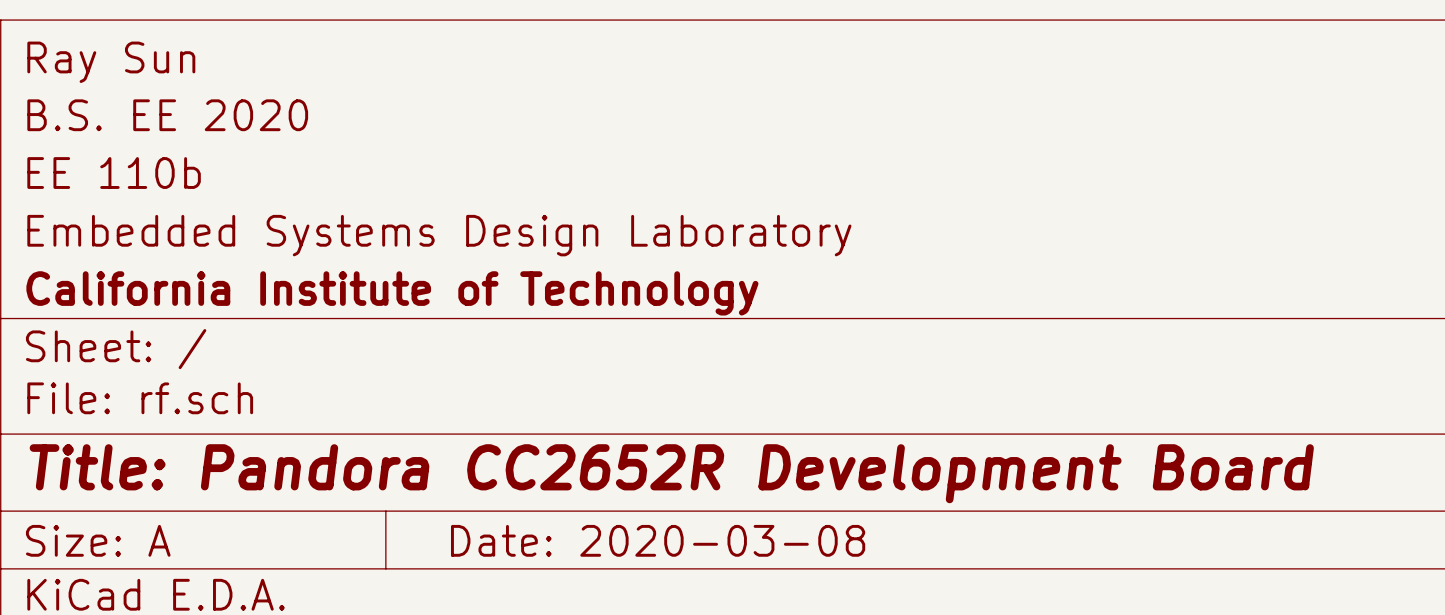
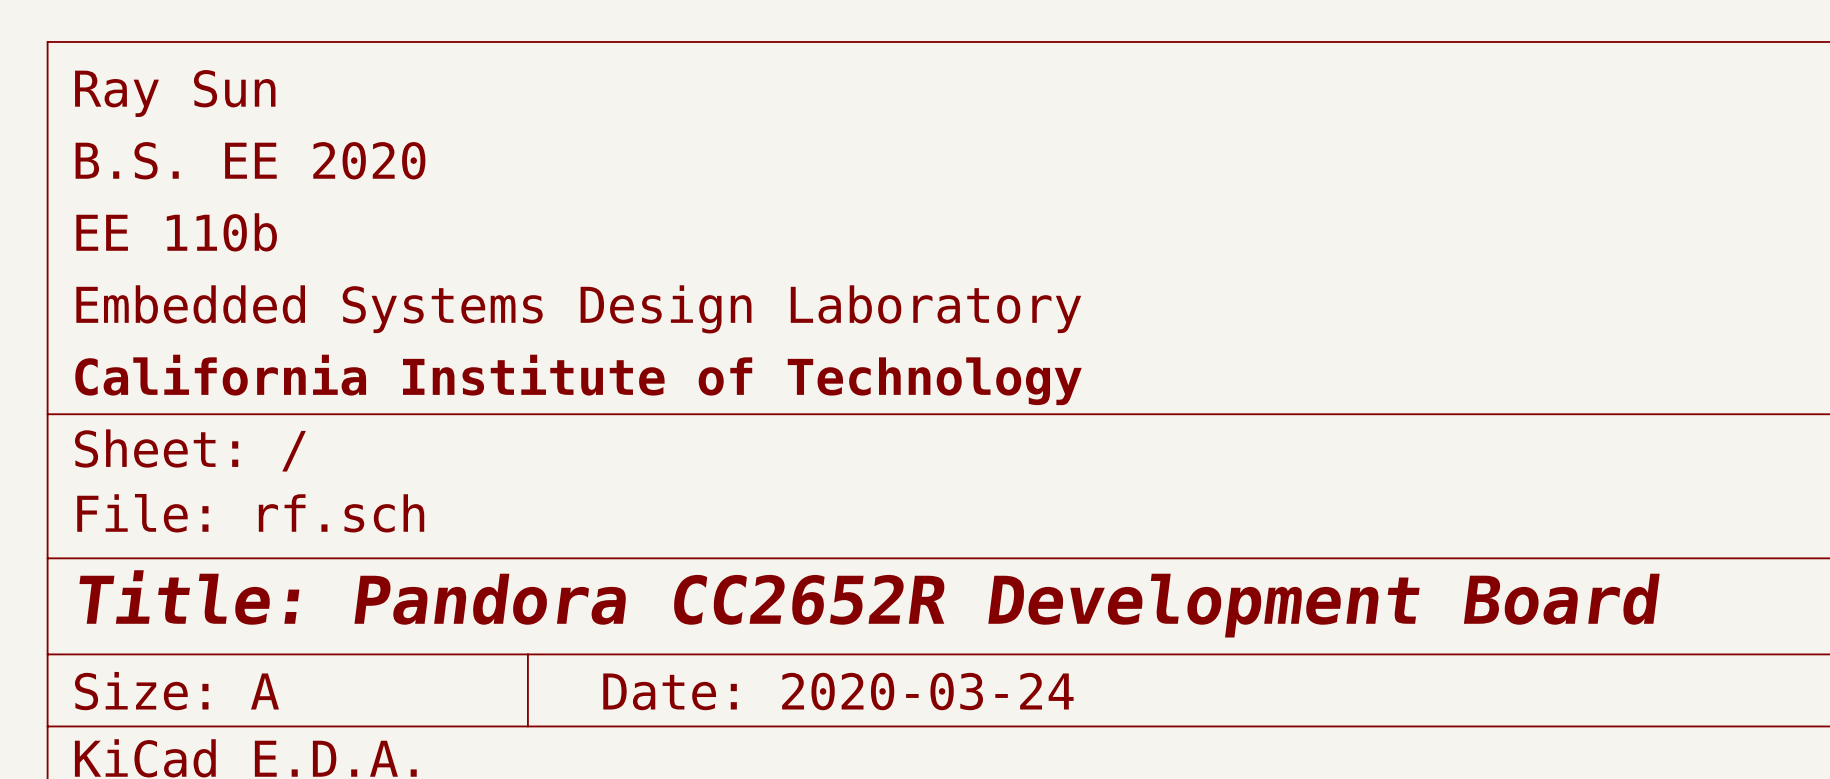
title block: Date: 2020-03-08 (658, 540) -> Date: 2020-03-24 (838, 691)

